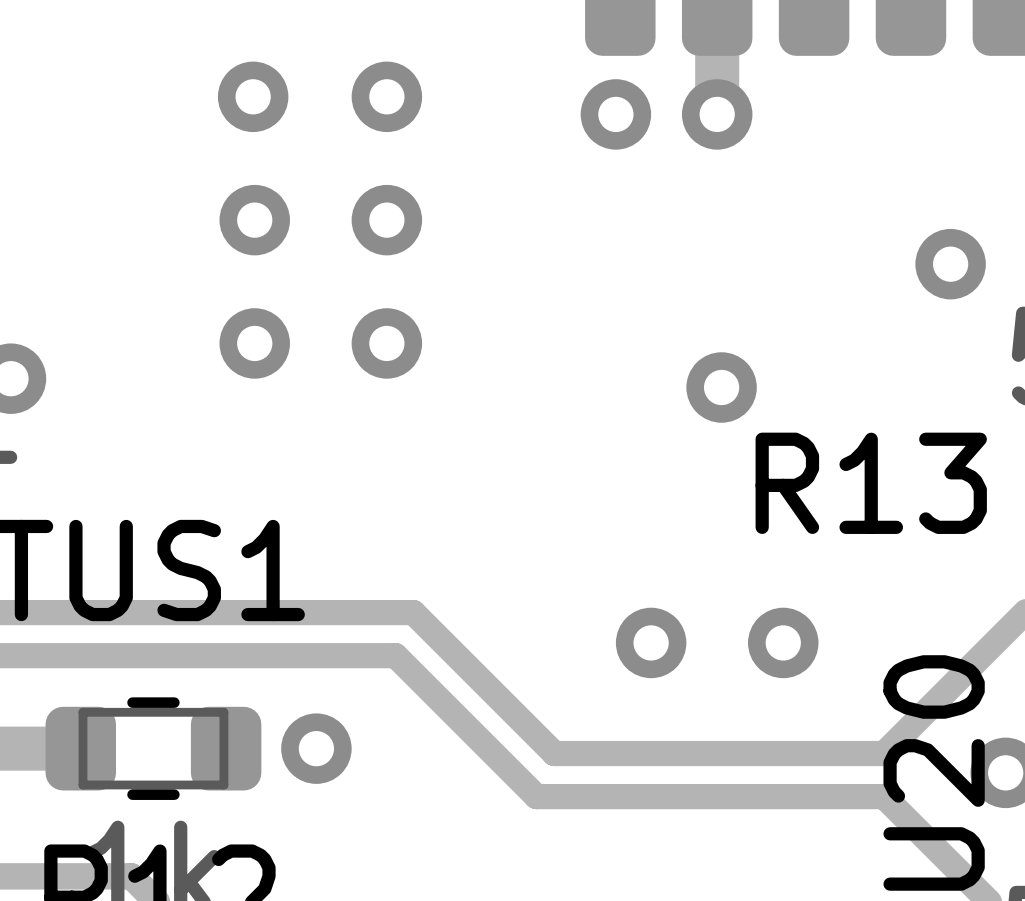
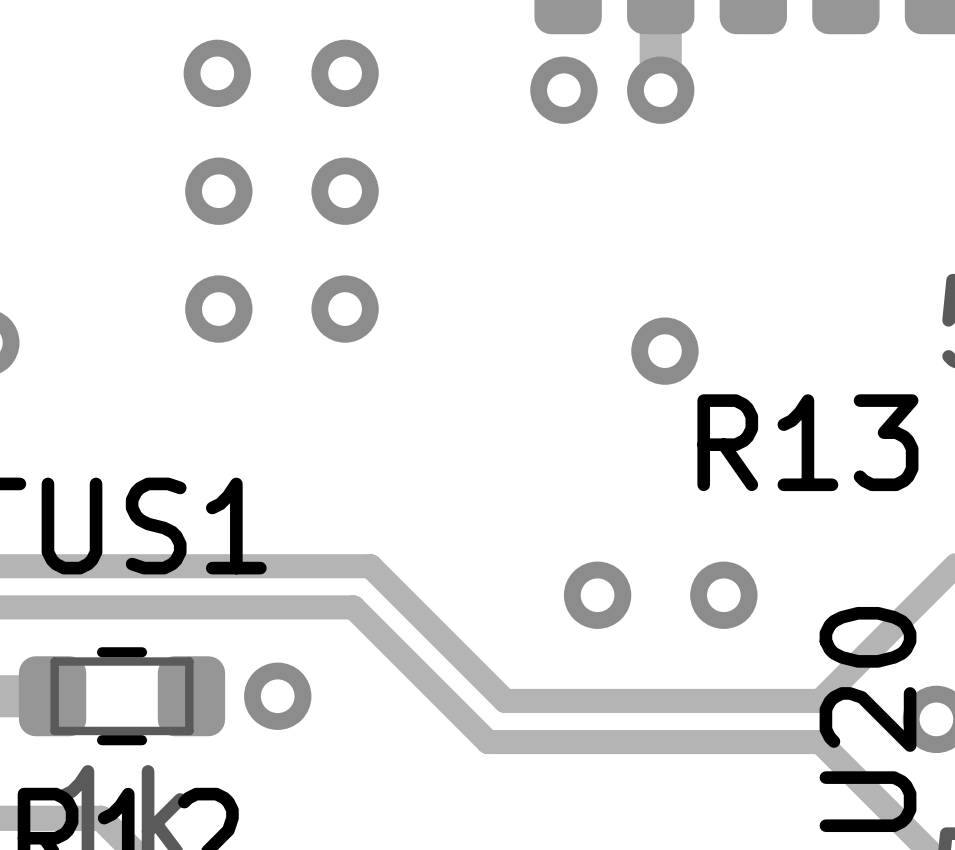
via: (950, 264) -> none

